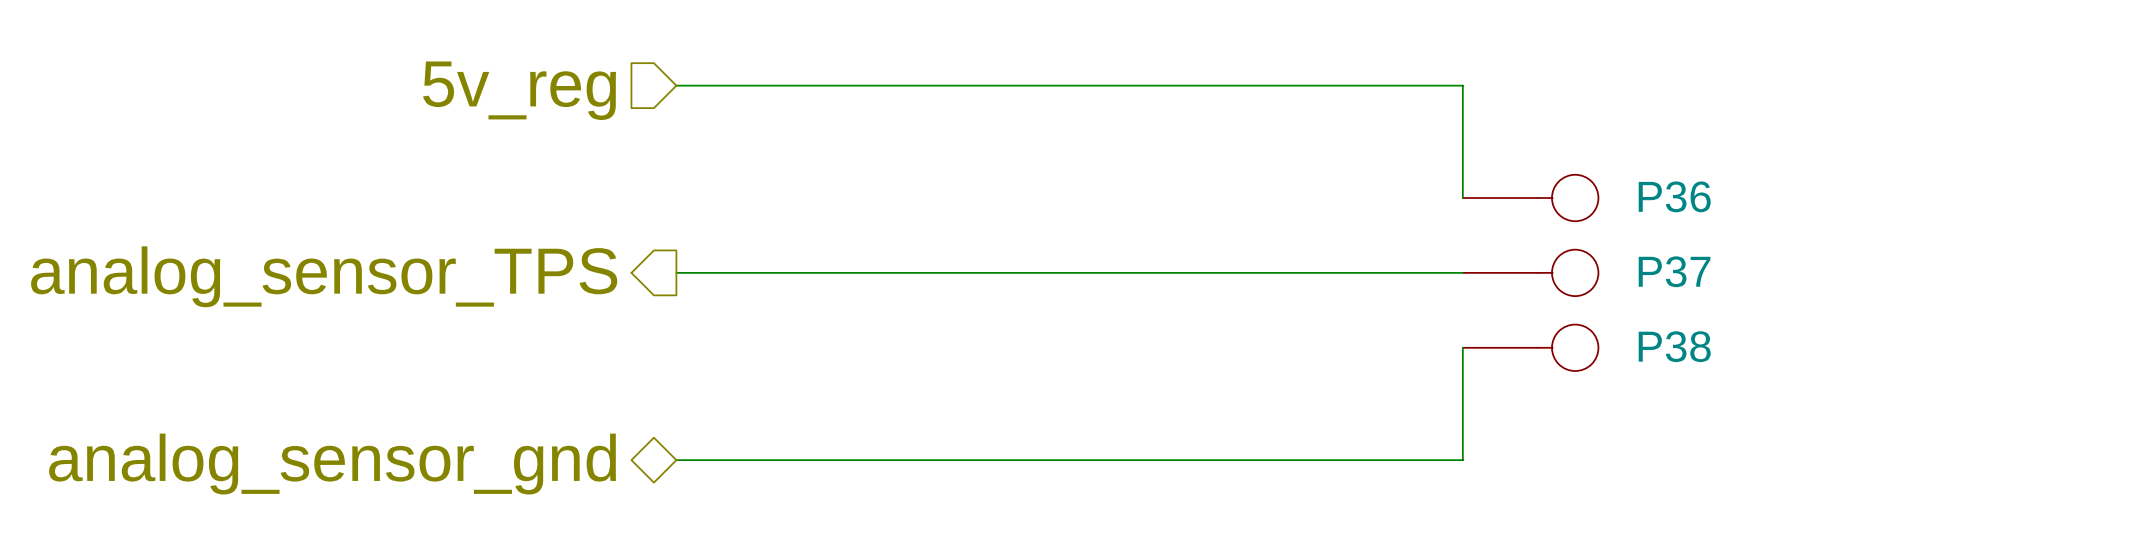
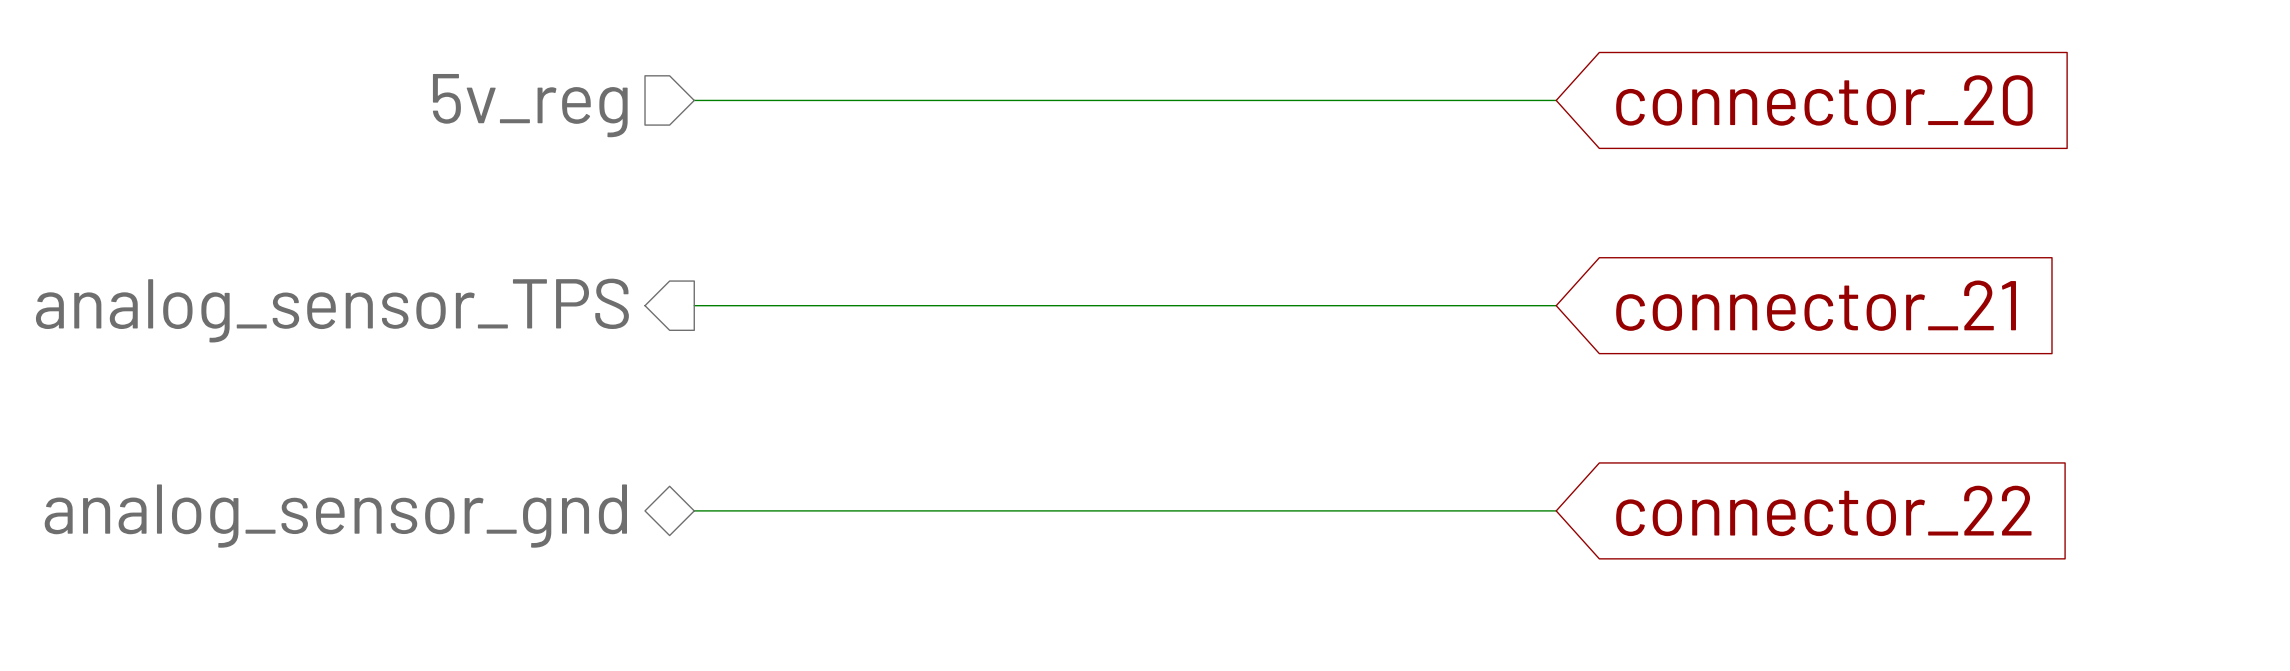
wire: (1462, 85) (1462, 197) -> none
global label: none -> connector_20 (1824, 100)
P36: (1530, 197) -> none
P37: (1530, 272) -> none
global label: none -> connector_21 (1816, 305)
wire: (1462, 347) (1462, 460) -> none
P38: (1530, 347) -> none
global label: none -> connector_22 (1823, 510)

